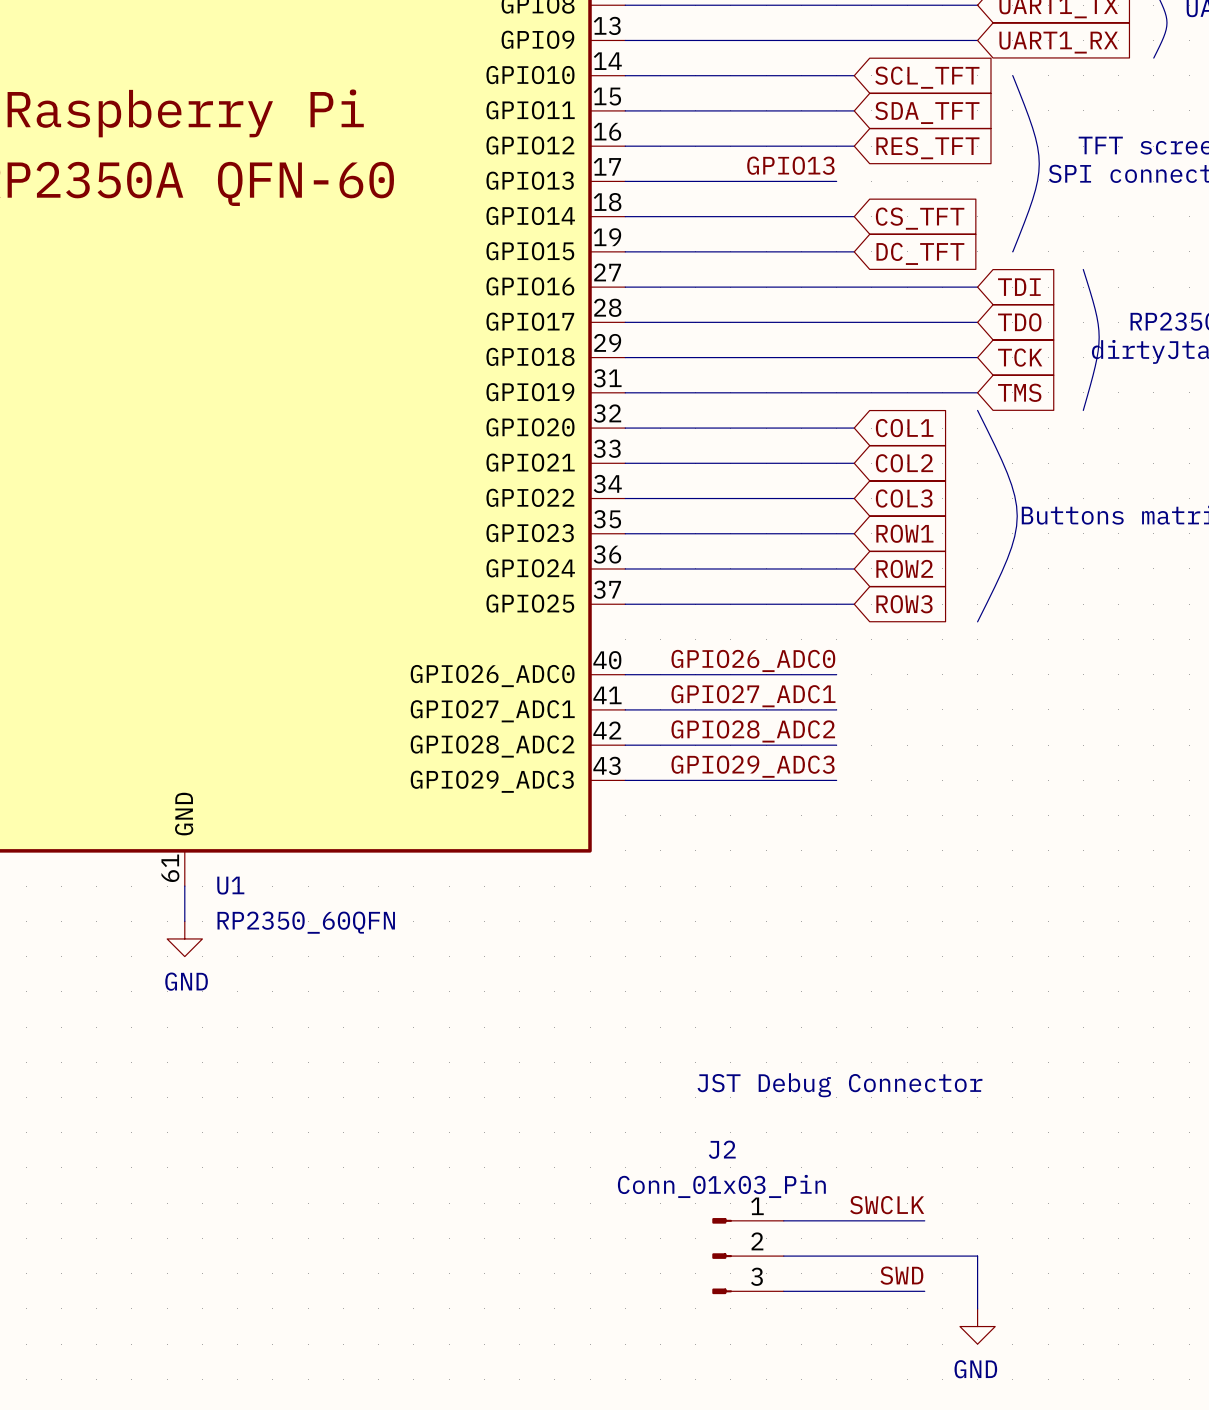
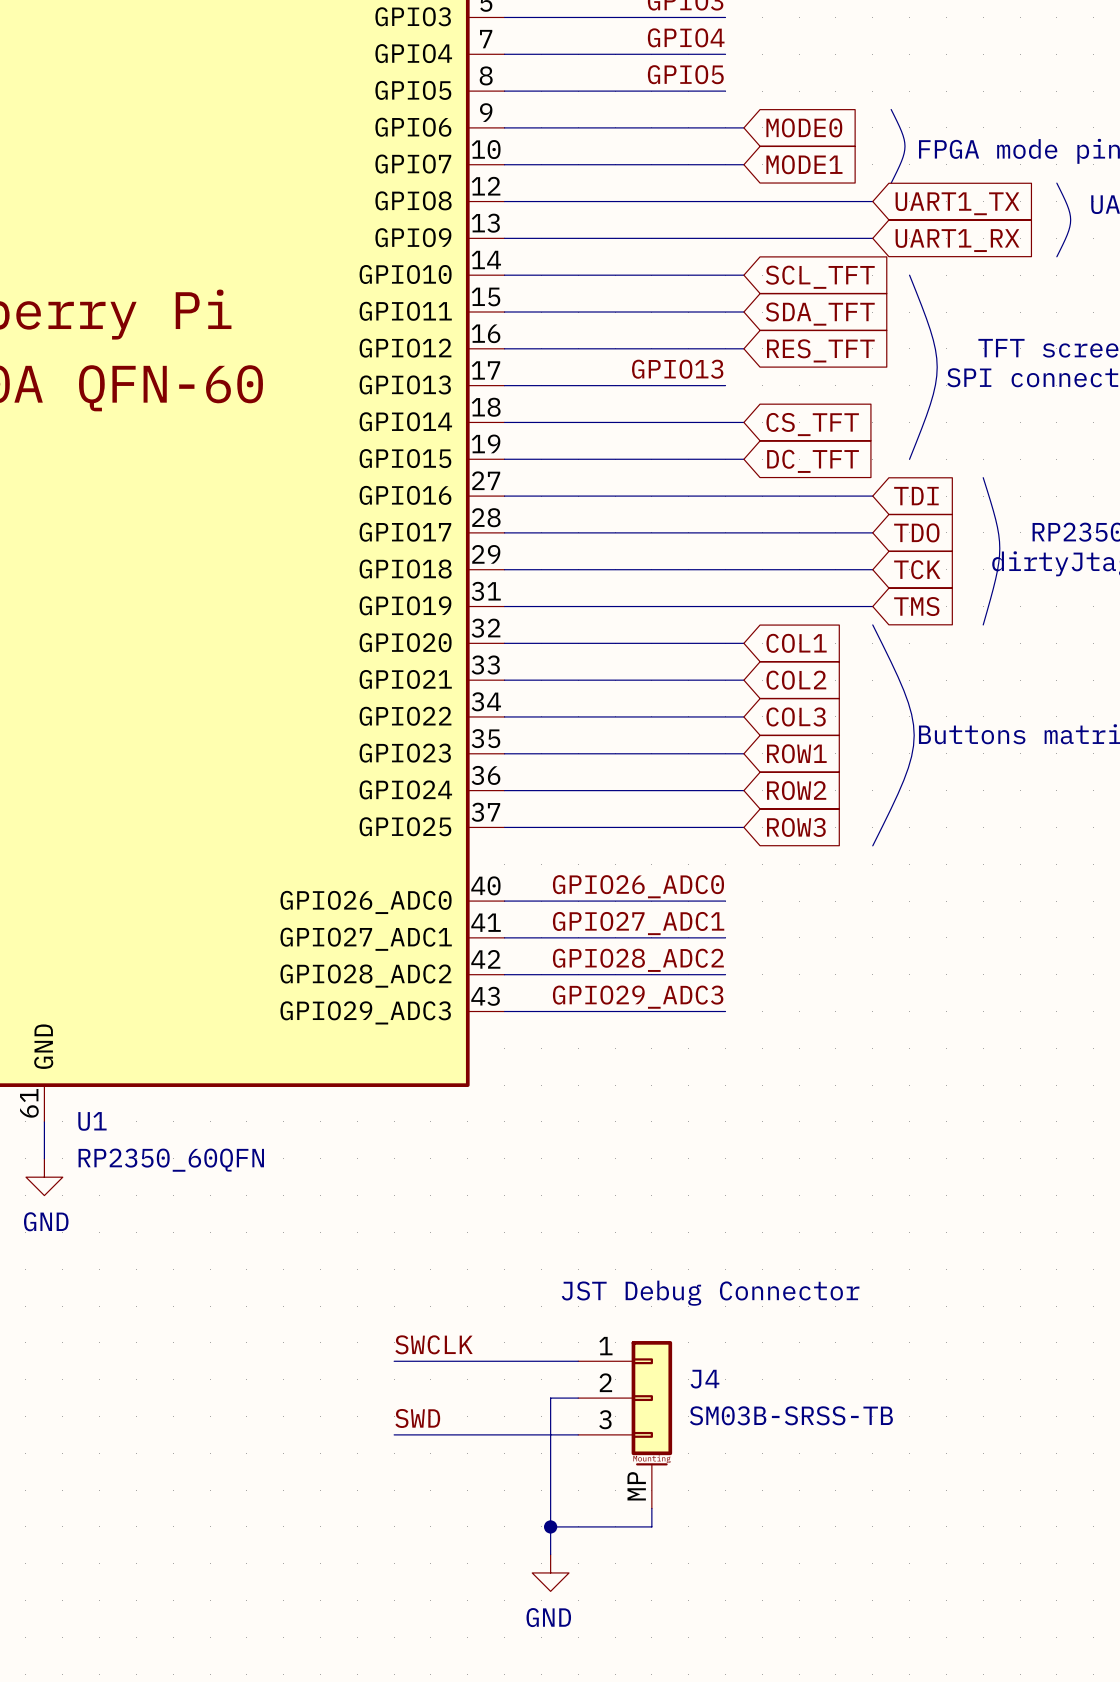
text position: JST Debug Connector (840, 1085) -> JST Debug Connector (710, 1293)
label: none -> SWCLK (434, 1344)
wire: none -> (394, 1361) (578, 1361)
wire: none -> (578, 1398) (550, 1398) (550, 1554)
label: none -> SWD (417, 1418)
J4: none -> SM03B-SRSS-TB (625, 1424)
wire: none -> (394, 1434) (578, 1434)
label: SWCLK (887, 1205) -> none
wire: (783, 1220) (924, 1220) -> none
J2: Conn_01x03_Pin (748, 1256) -> none
wire: none -> (651, 1508) (651, 1526) (550, 1526)
wire: (783, 1256) (977, 1256) (977, 1308) -> none
junction: none -> (550, 1526)
label: SWD (901, 1275) -> none
wire: (783, 1291) (924, 1291) -> none
power symbol position: GND (977, 1326) -> GND (550, 1572)

